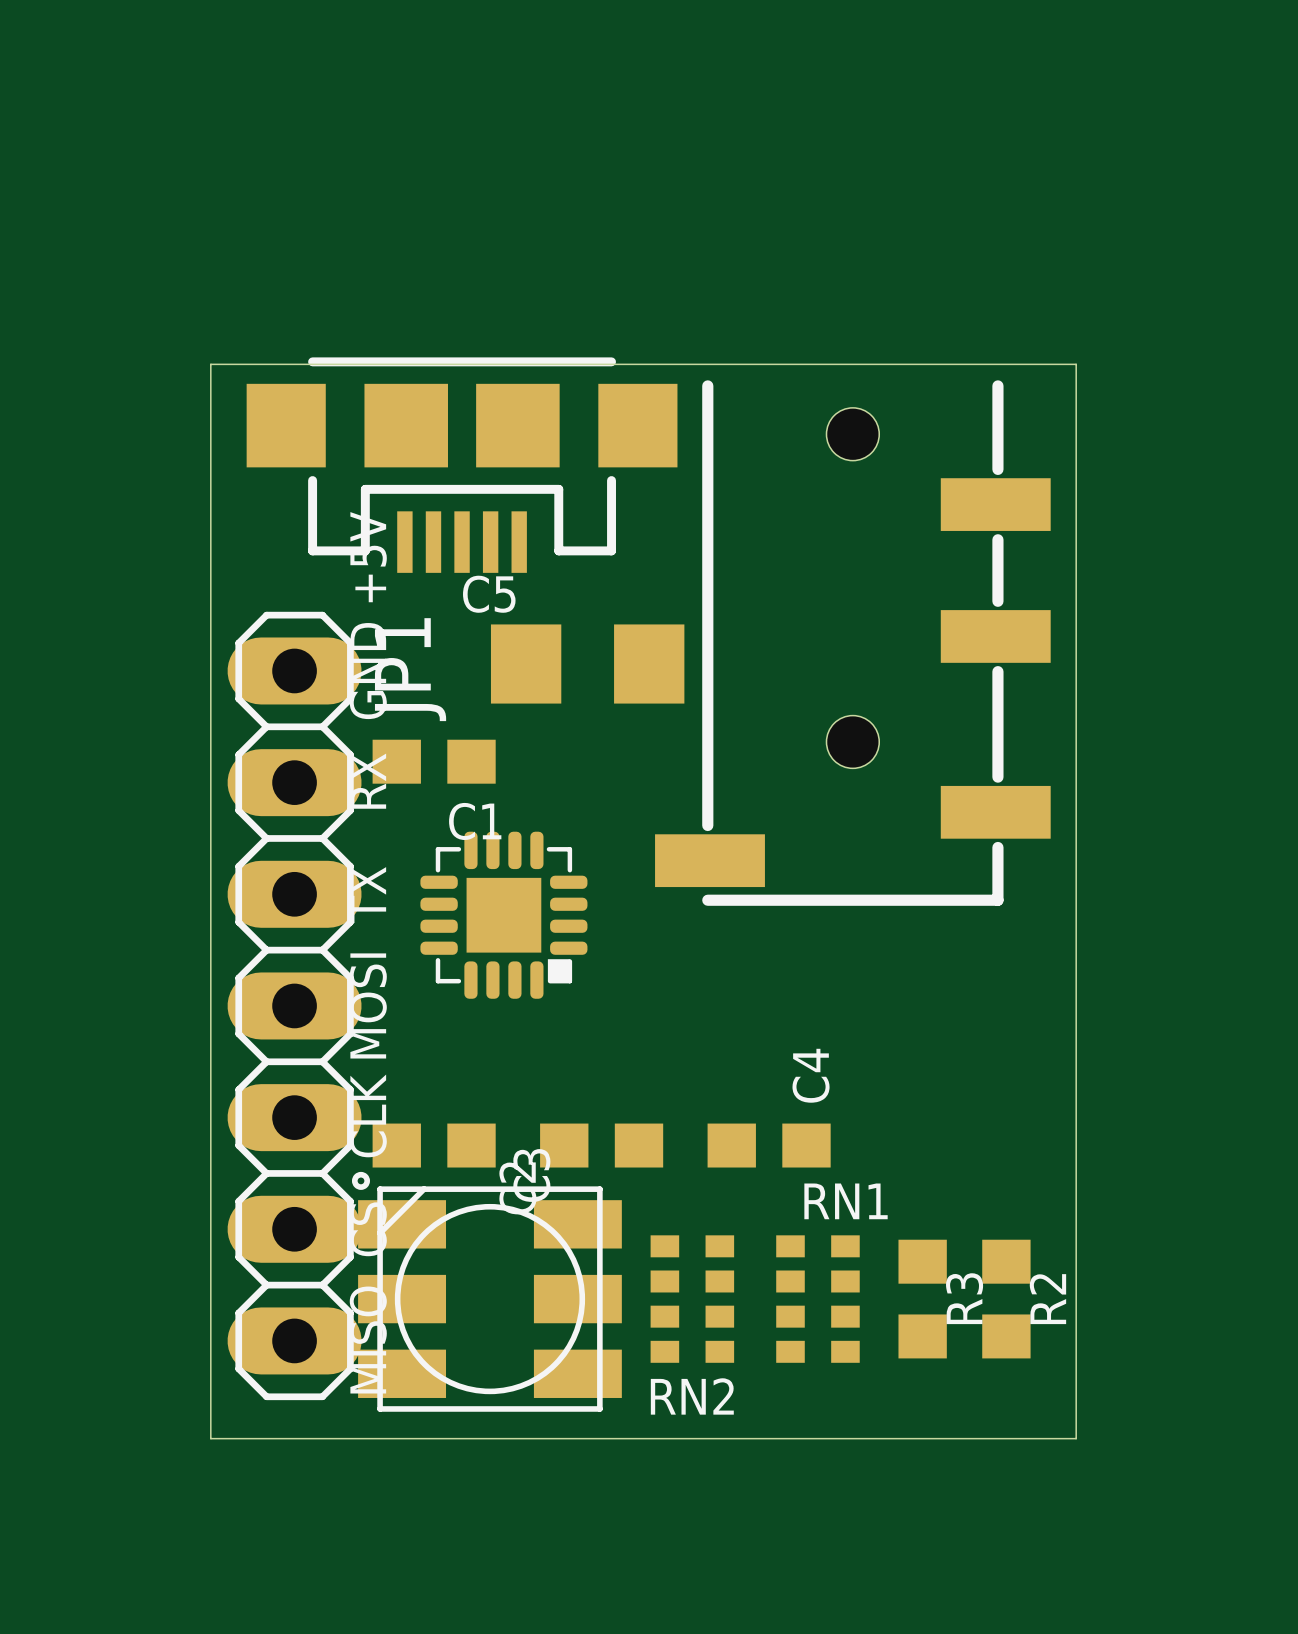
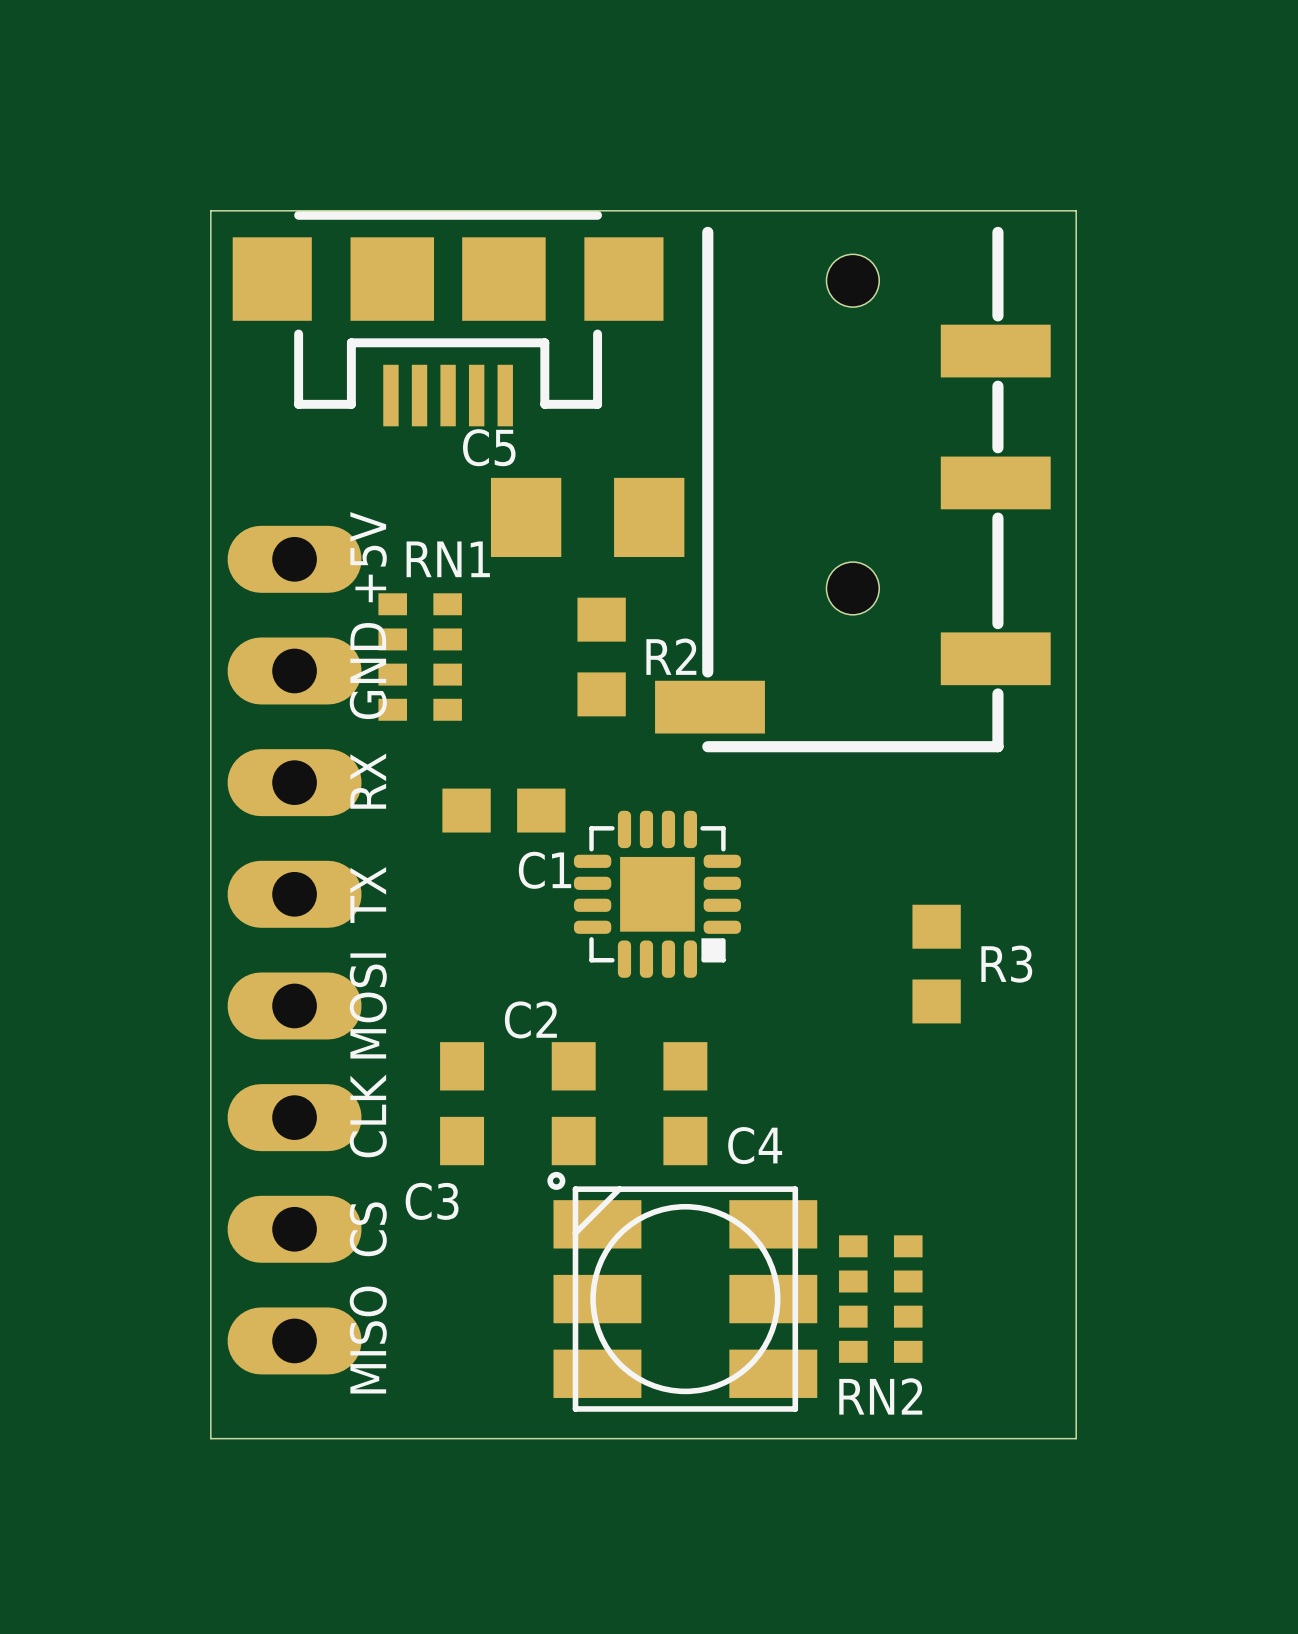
board edge: (210, 364) (1076, 364) -> (210, 364) (210, 210) (1076, 210) (1076, 364)
part position: (462, 465) -> (448, 318)
part position: (852, 643) -> (852, 489)
C5 position: (587, 664) -> (587, 517)
C1 position: (434, 761) -> (503, 810)
part position: (503, 915) -> (657, 894)
part: none -> (294, 950)
JP1: (294, 1005) -> none
C3 rotation: 0° (434, 1145) -> 90° clockwise (462, 1103)
C2 rotation: 0° (601, 1145) -> 90° clockwise (573, 1103)
C4 rotation: 0° (769, 1145) -> 90° clockwise (685, 1103)
C4 position: (769, 1145) -> (685, 1103)
part position: (486, 1291) -> (682, 1291)
R3 name rotation: 0° (964, 1298) -> 90° clockwise (1006, 964)
RN2 position: (692, 1299) -> (880, 1299)
RN1 position: (817, 1299) -> (420, 657)
R3 position: (922, 1299) -> (936, 964)
R2 position: (1006, 1299) -> (601, 657)
R2 name rotation: 0° (1047, 1299) -> 90° clockwise (671, 656)

